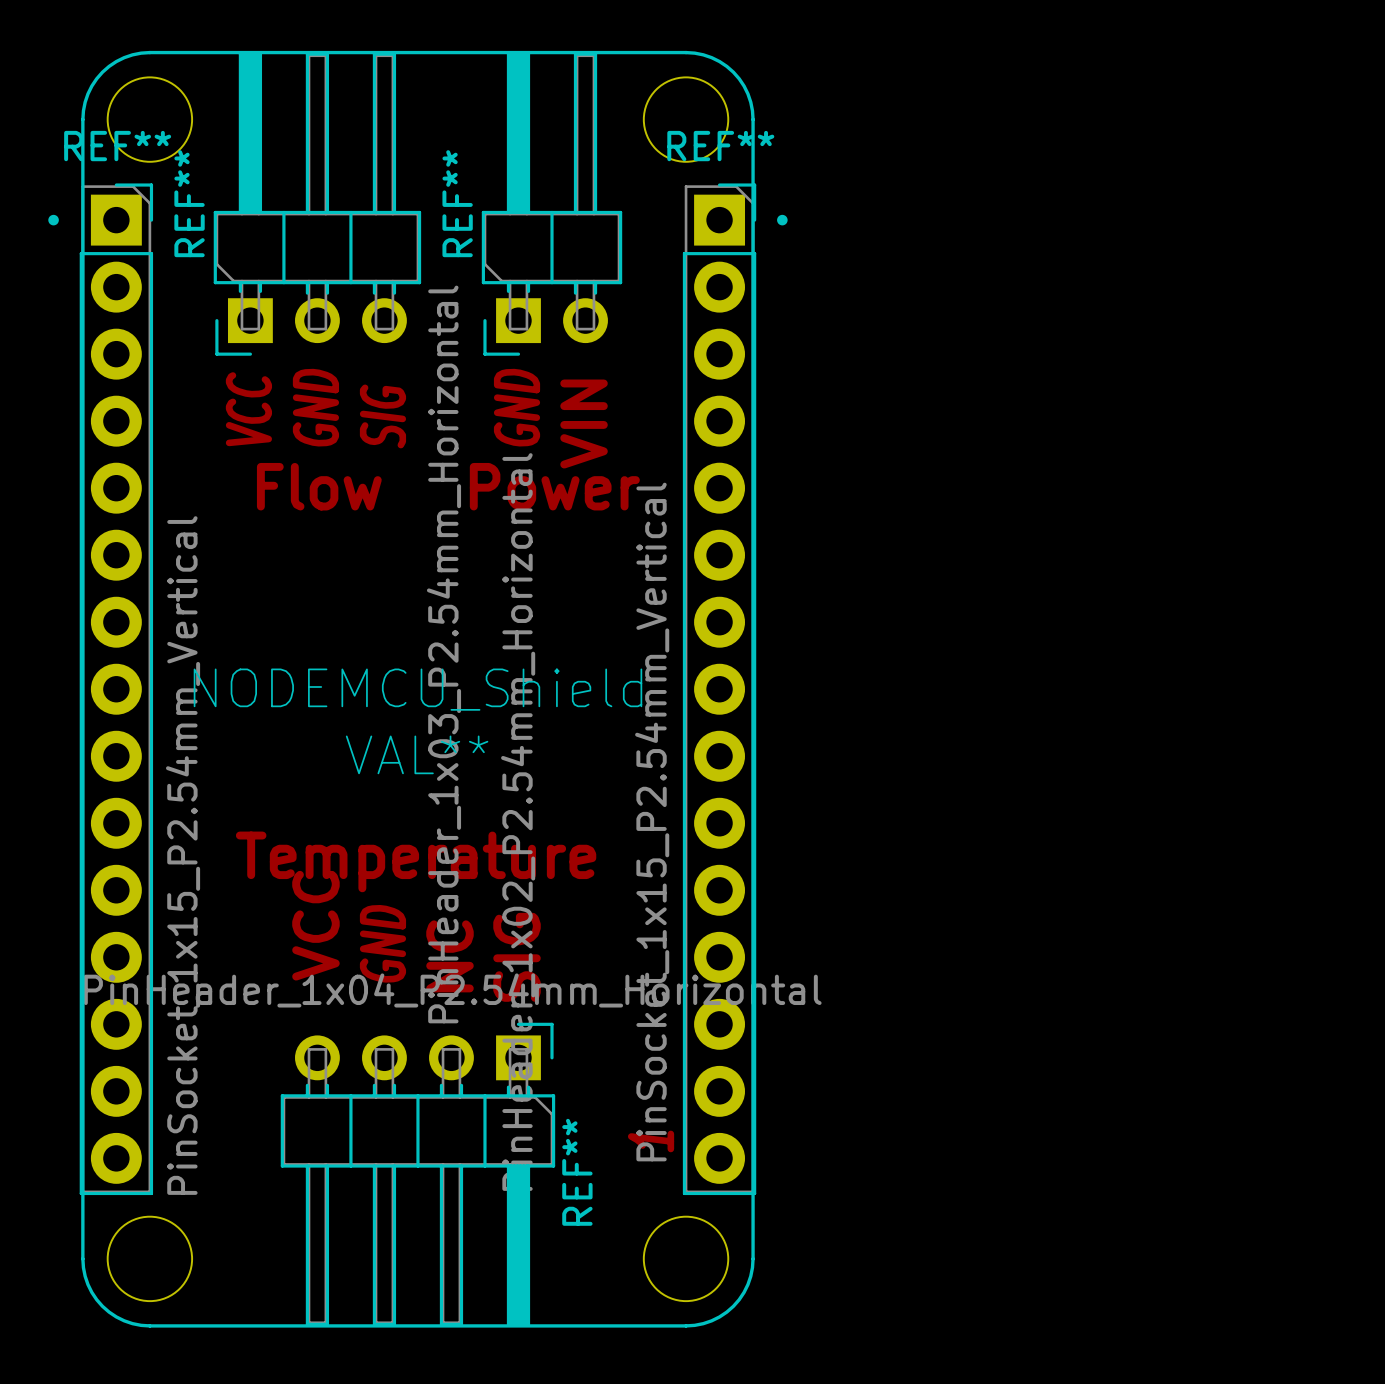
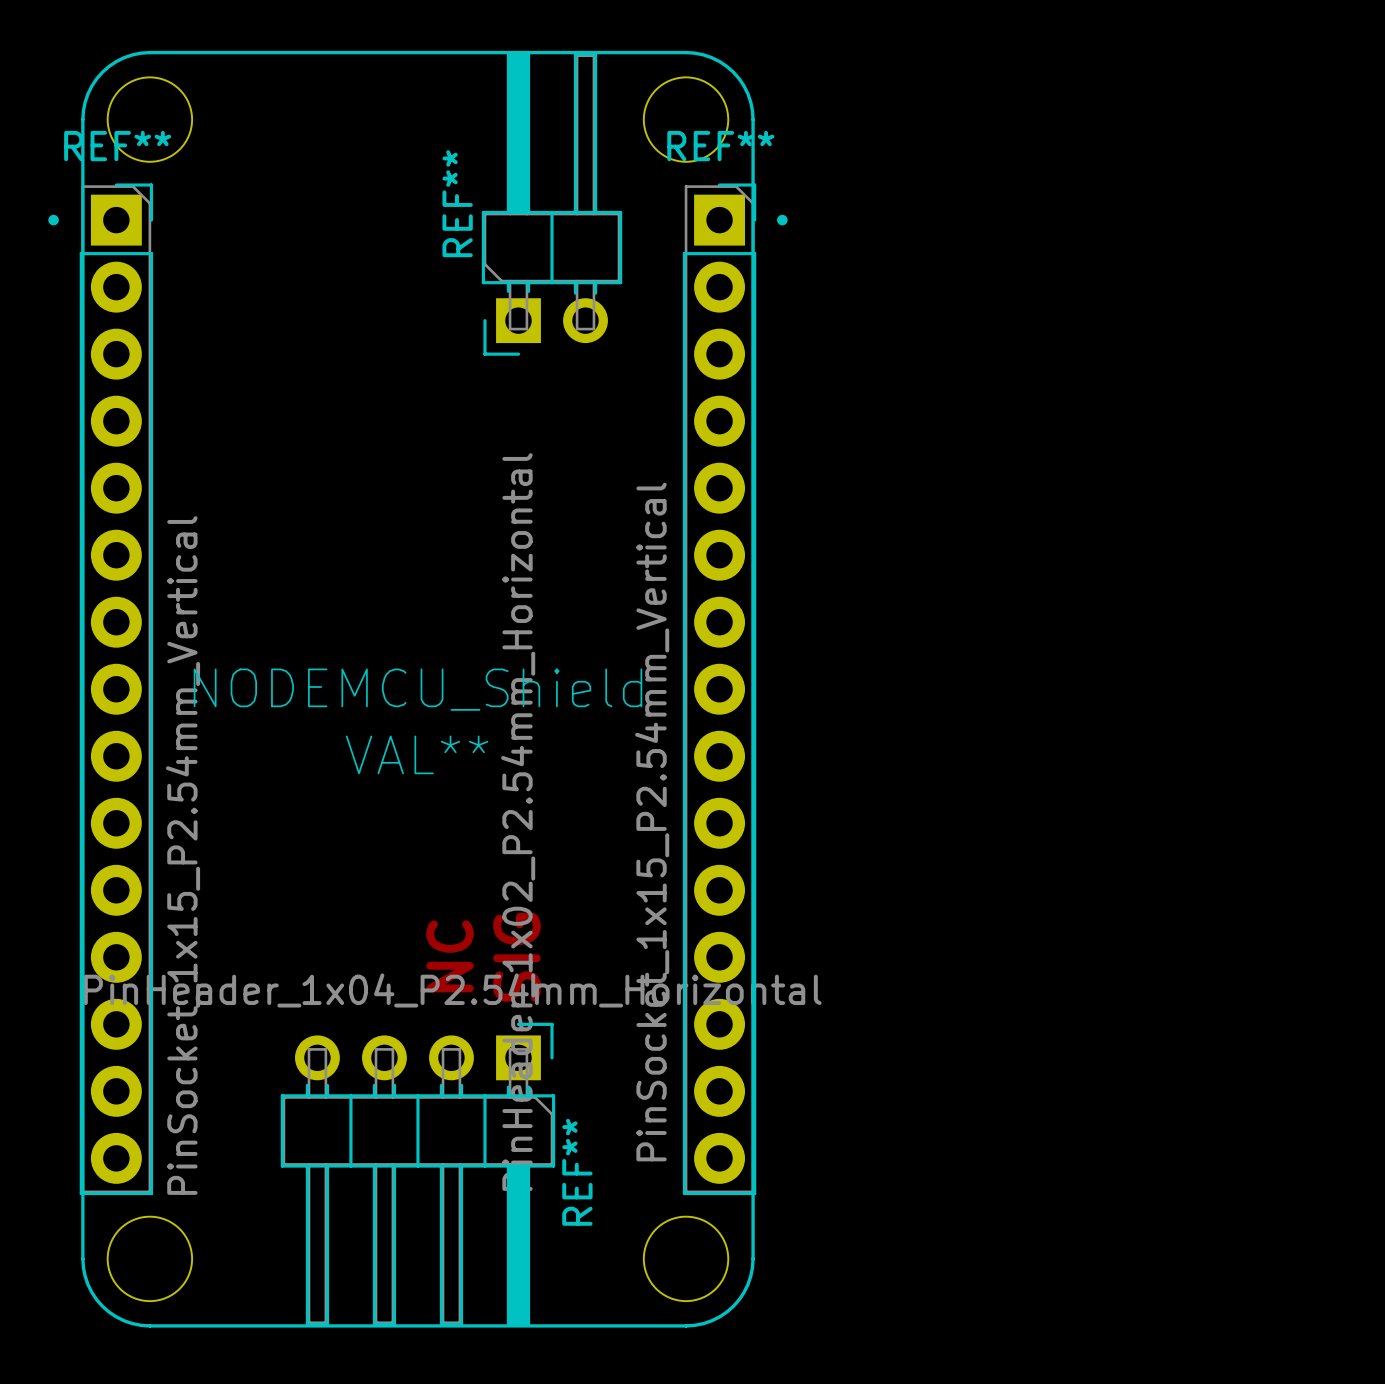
REF**: PinHeader_1x03_P2.54mm_Horizontal (317, 204) -> none
text: GND (315, 407) -> none
text: GND (517, 407) -> none
text: VCC (248, 409) -> none
text: SIG (382, 416) -> none
text: VIN (584, 424) -> none
text: Flow (319, 486) -> none
text: Power (554, 486) -> none
text: Temperature (416, 861) -> none
text: VCC (315, 925) -> none
text: GND (382, 943) -> none
text: 1 (651, 1141) -> none

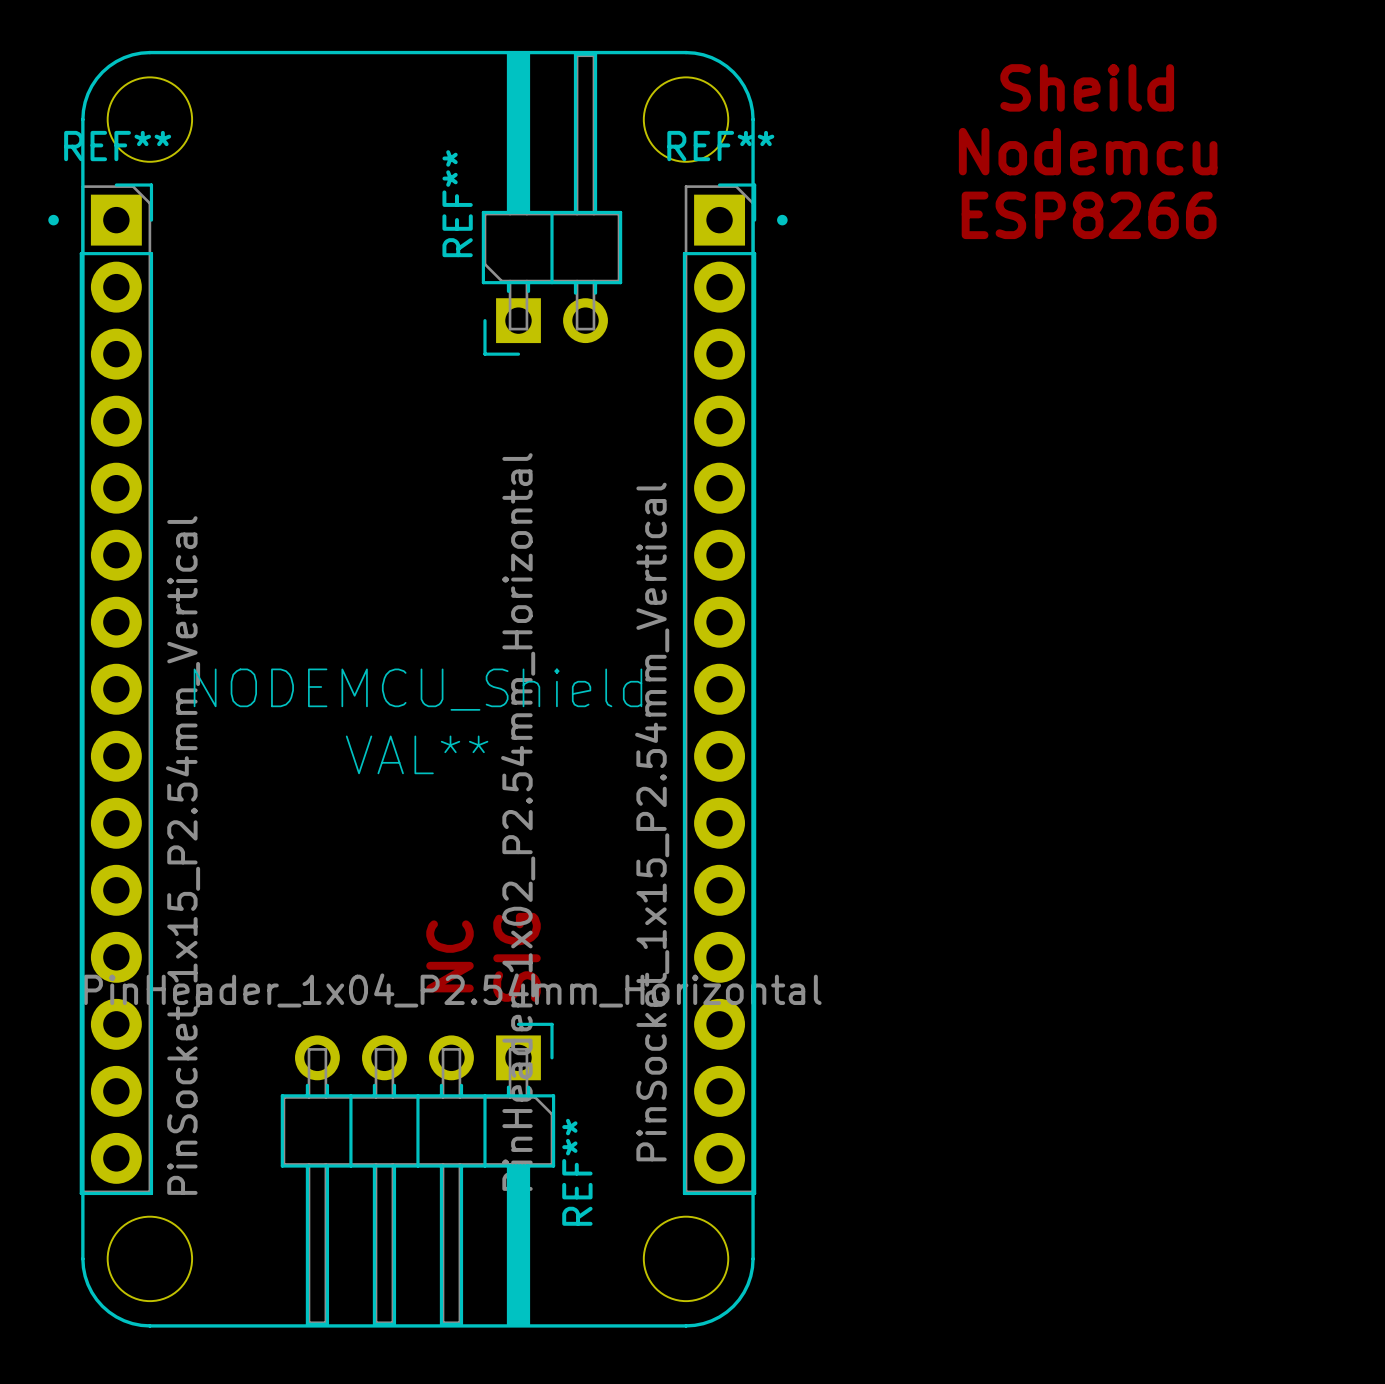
text: none -> Sheild (1087, 87)
text: none -> Nodemcu (1088, 151)
text: none -> ESP8266 (1089, 215)

